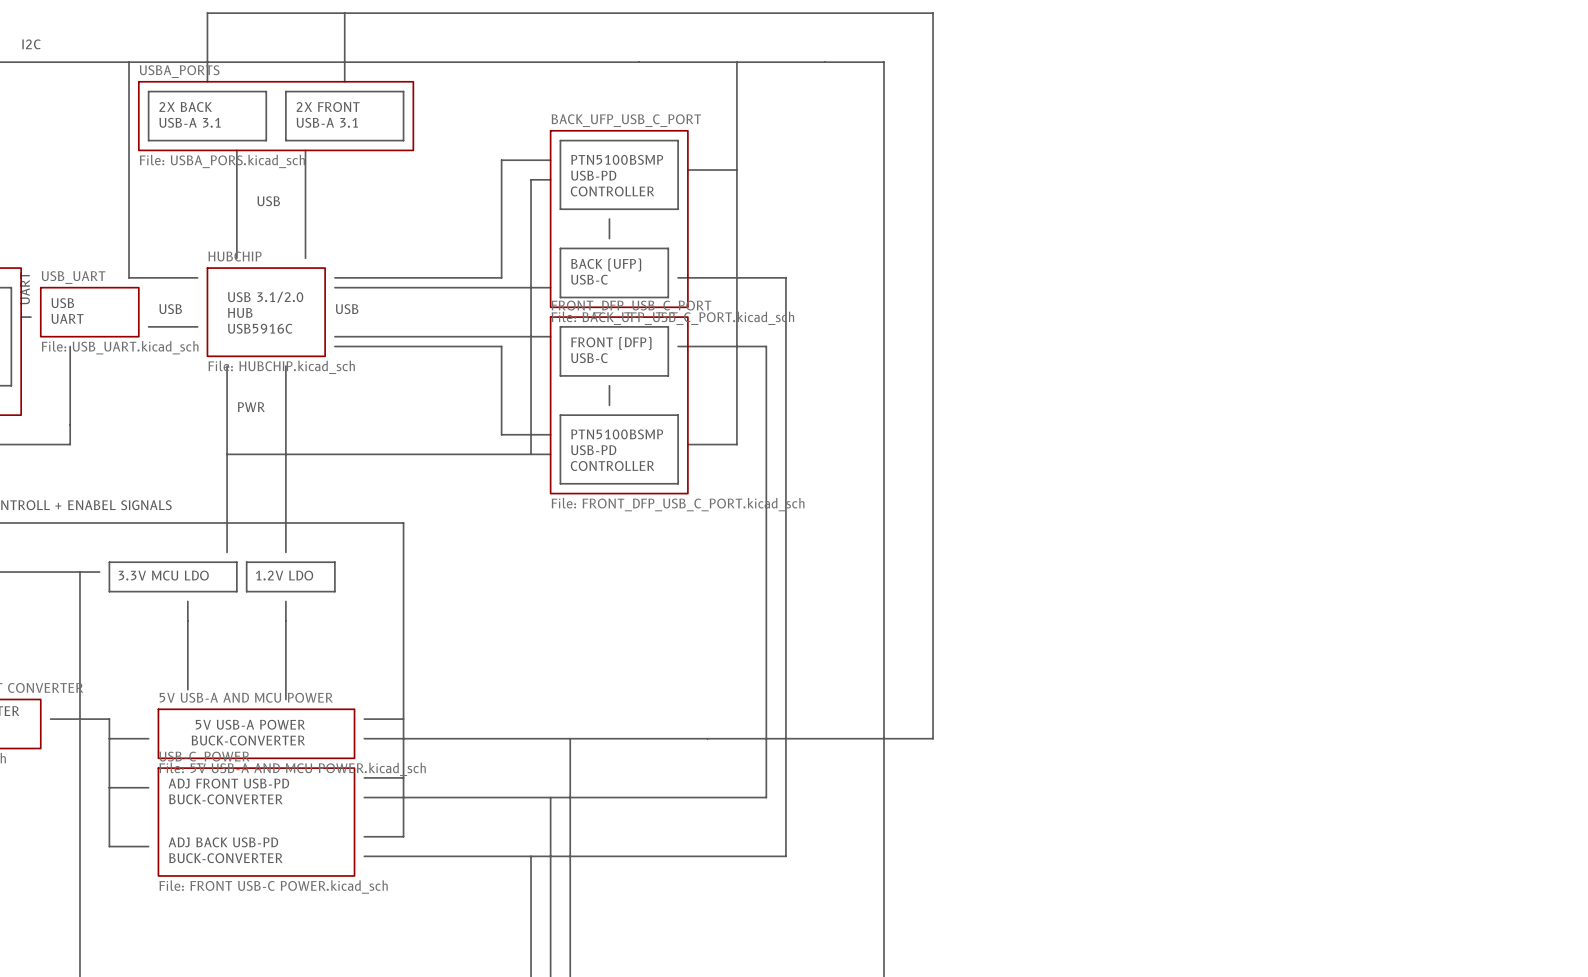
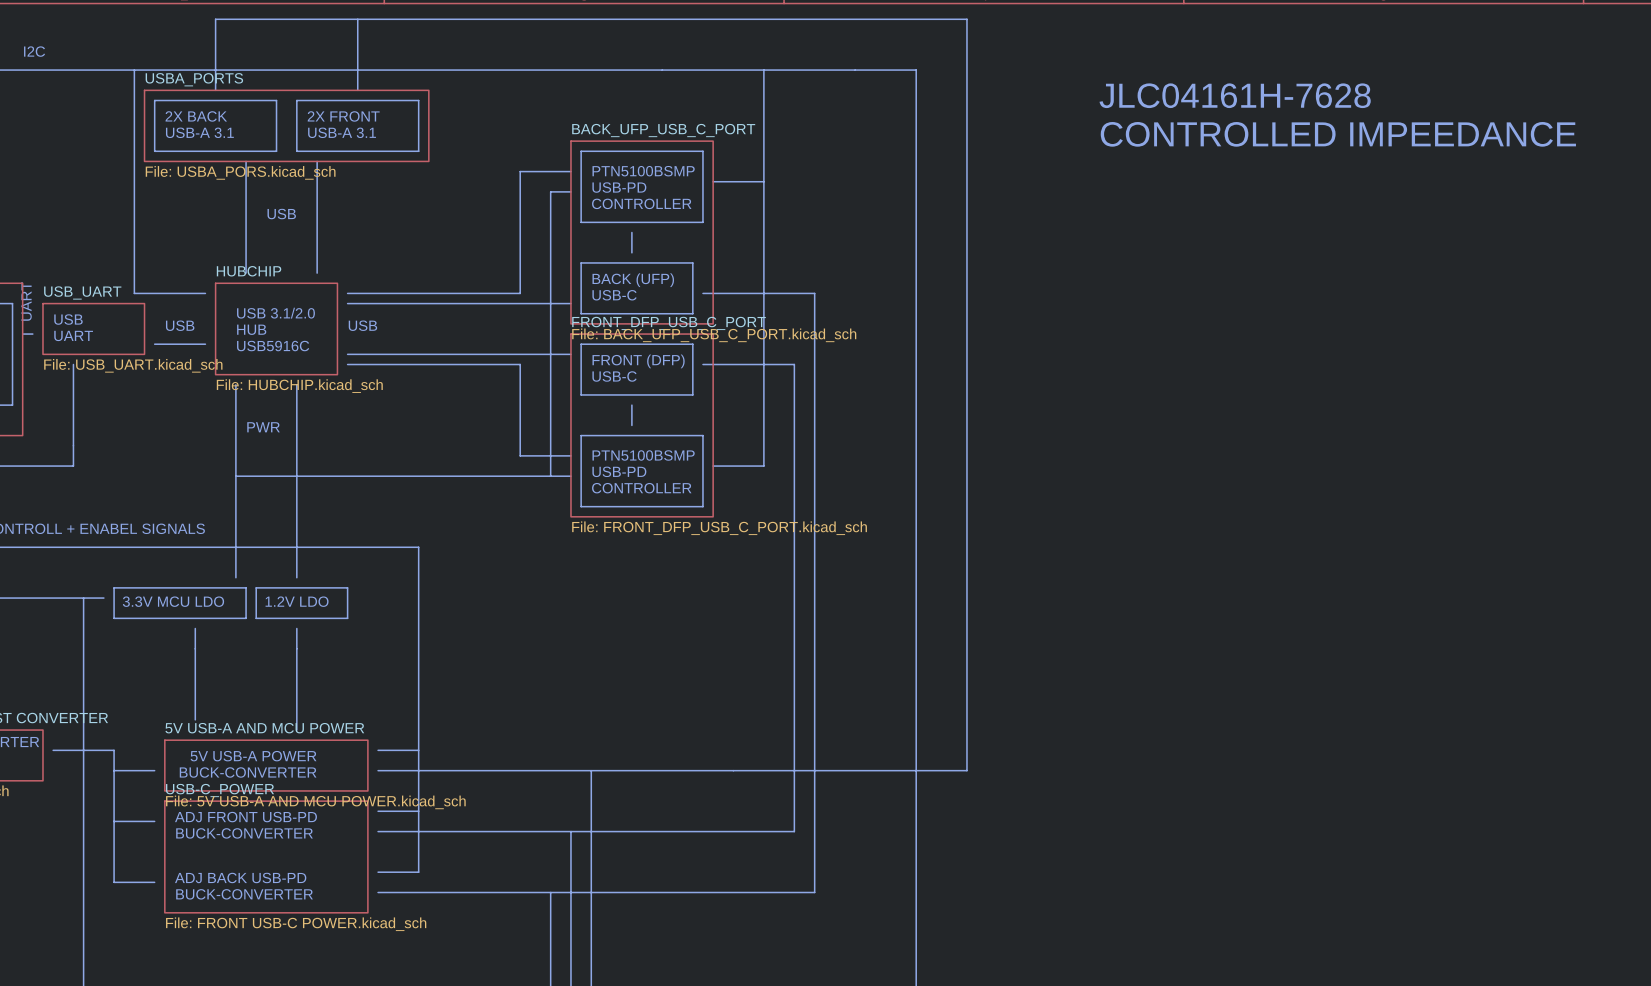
text: none -> JLC04161H-7628 (1235, 95)
text: none -> CONTROLLED IMPEEDANCE (1338, 134)

